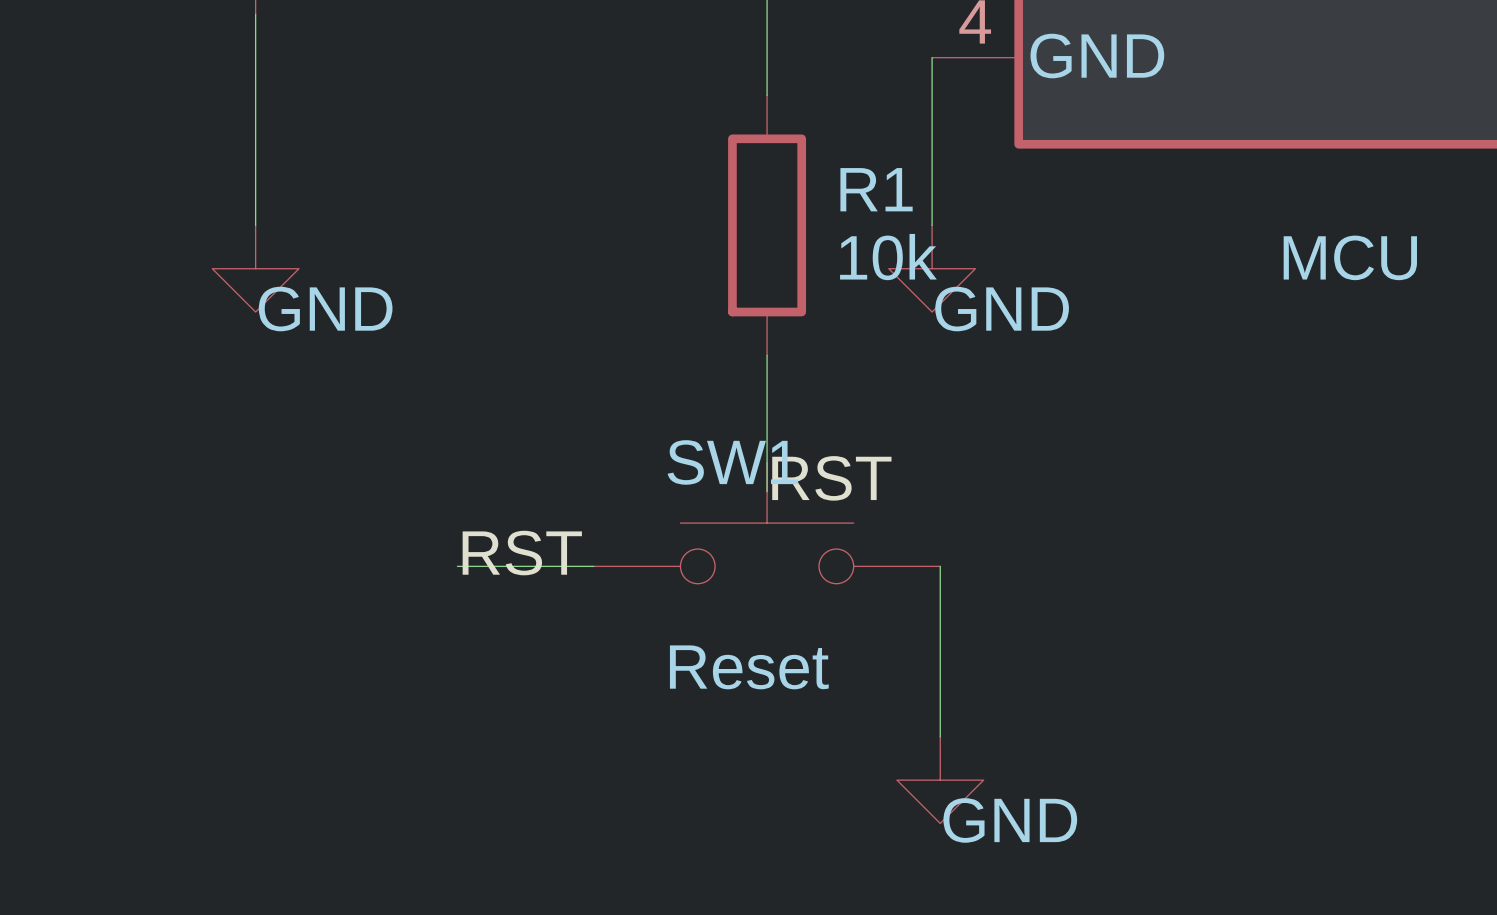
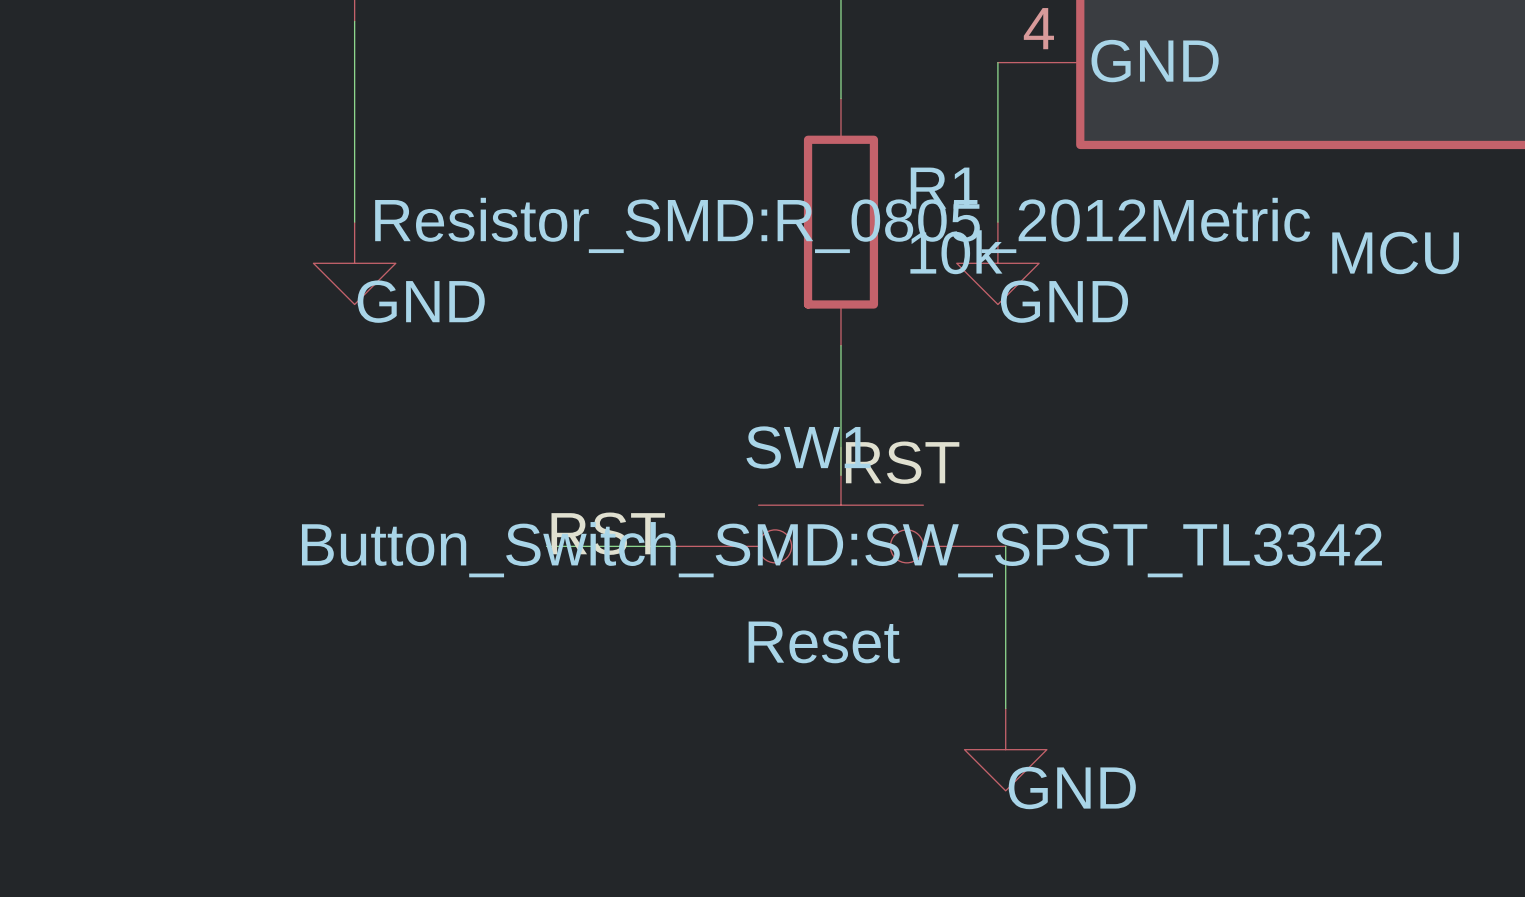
R1 text: none -> Resistor_SMD:R_0805_2012Metric (842, 225)
SW1 text: none -> Button_Switch_SMD:SW_SPST_TL3342 (841, 549)

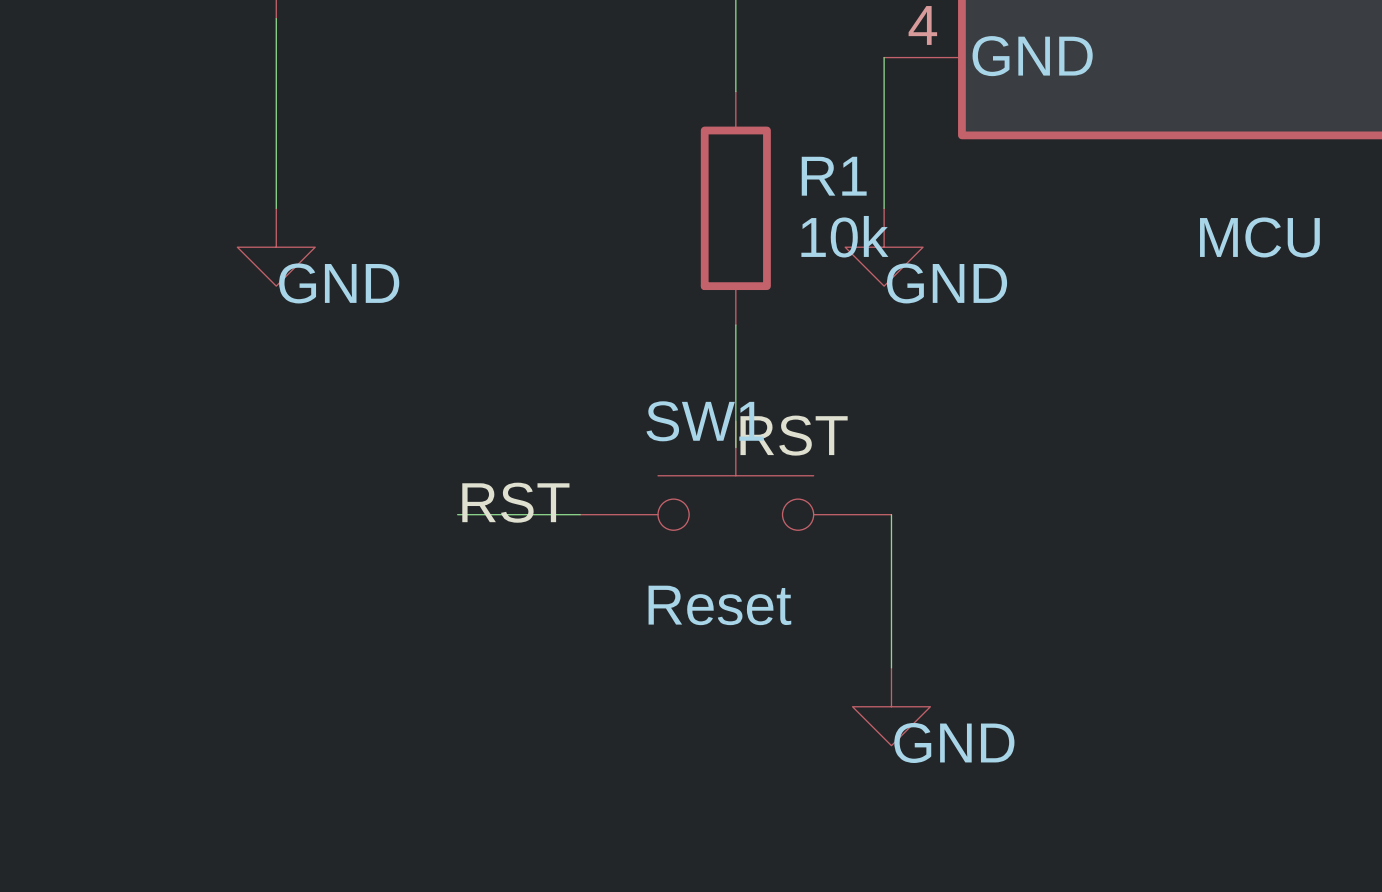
R1 text: Resistor_SMD:R_0805_2012Metric (842, 225) -> none
SW1 text: Button_Switch_SMD:SW_SPST_TL3342 (841, 549) -> none

